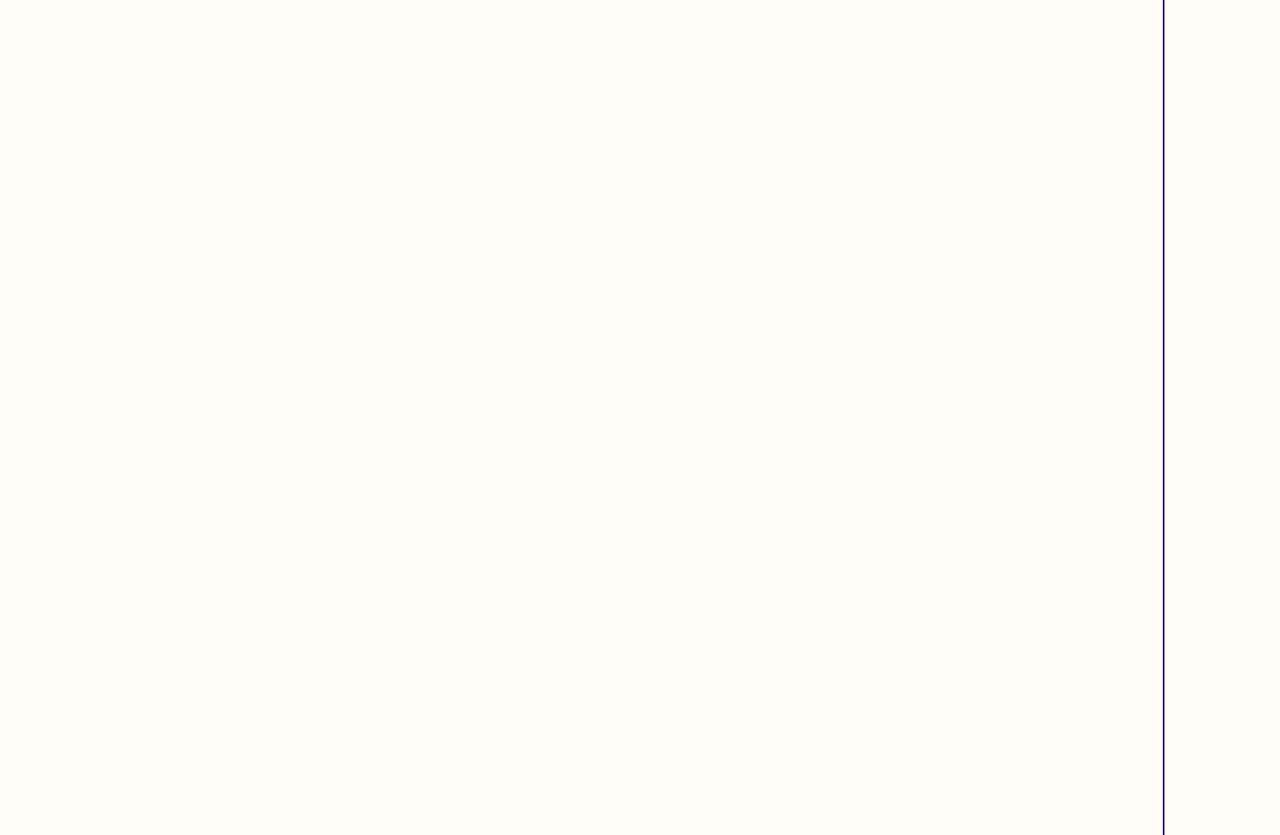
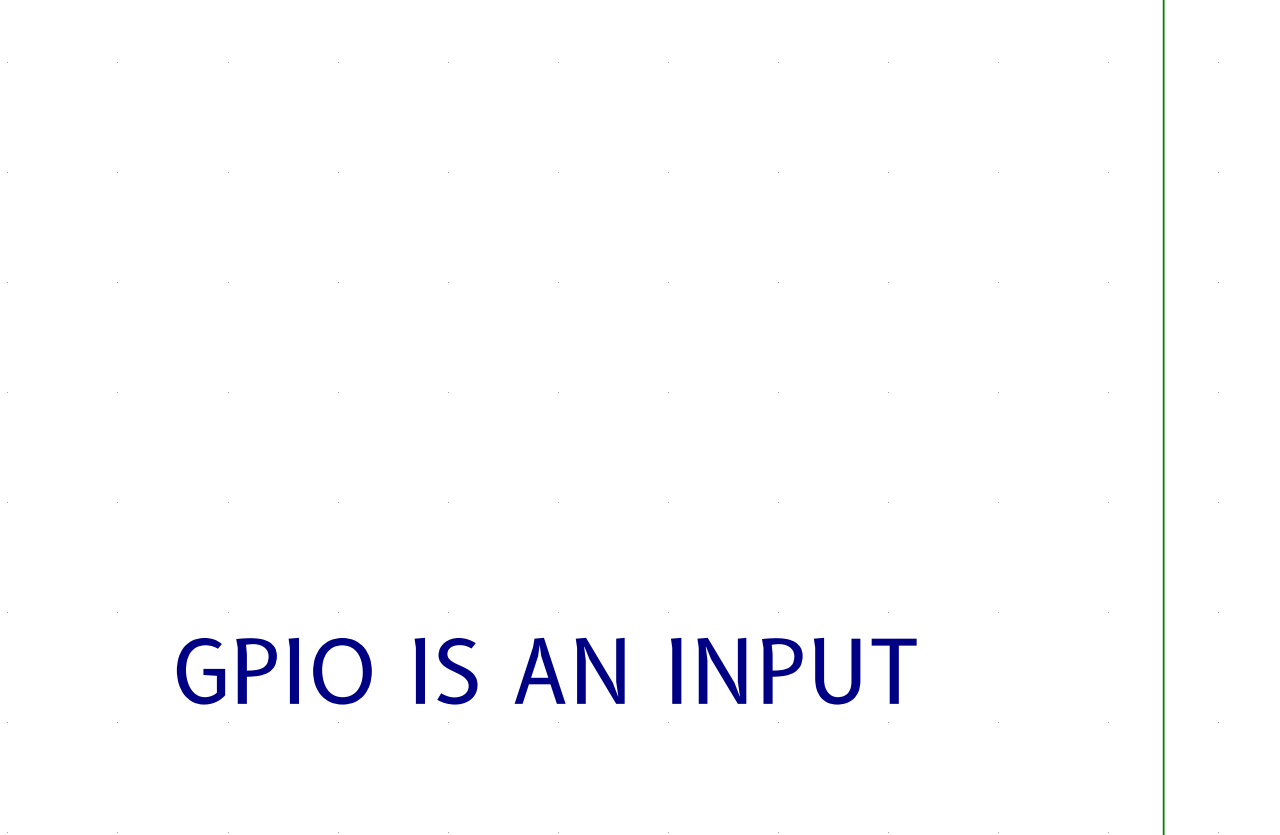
text: none -> GPIO IS AN INPUT (546, 671)

